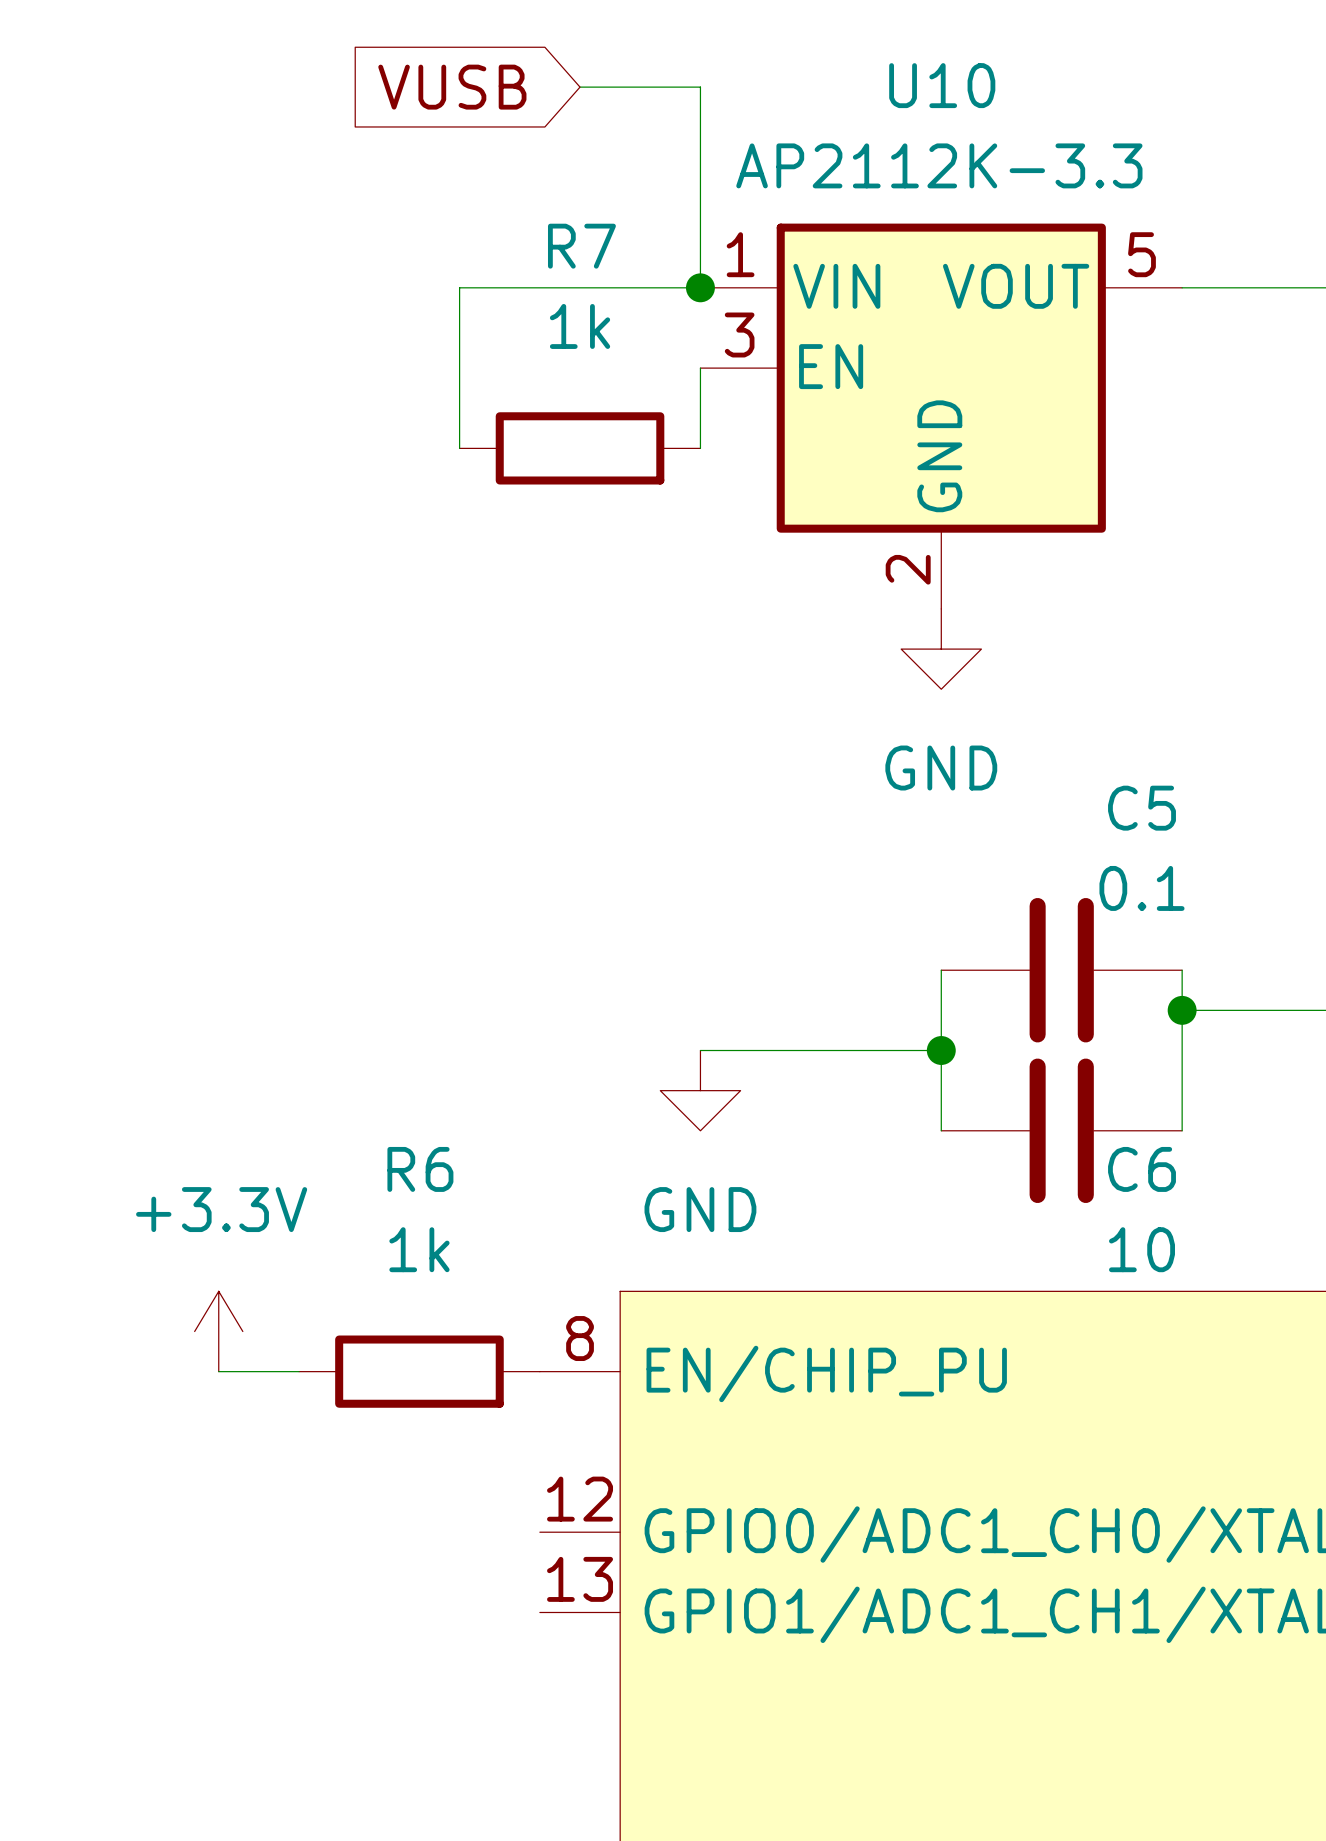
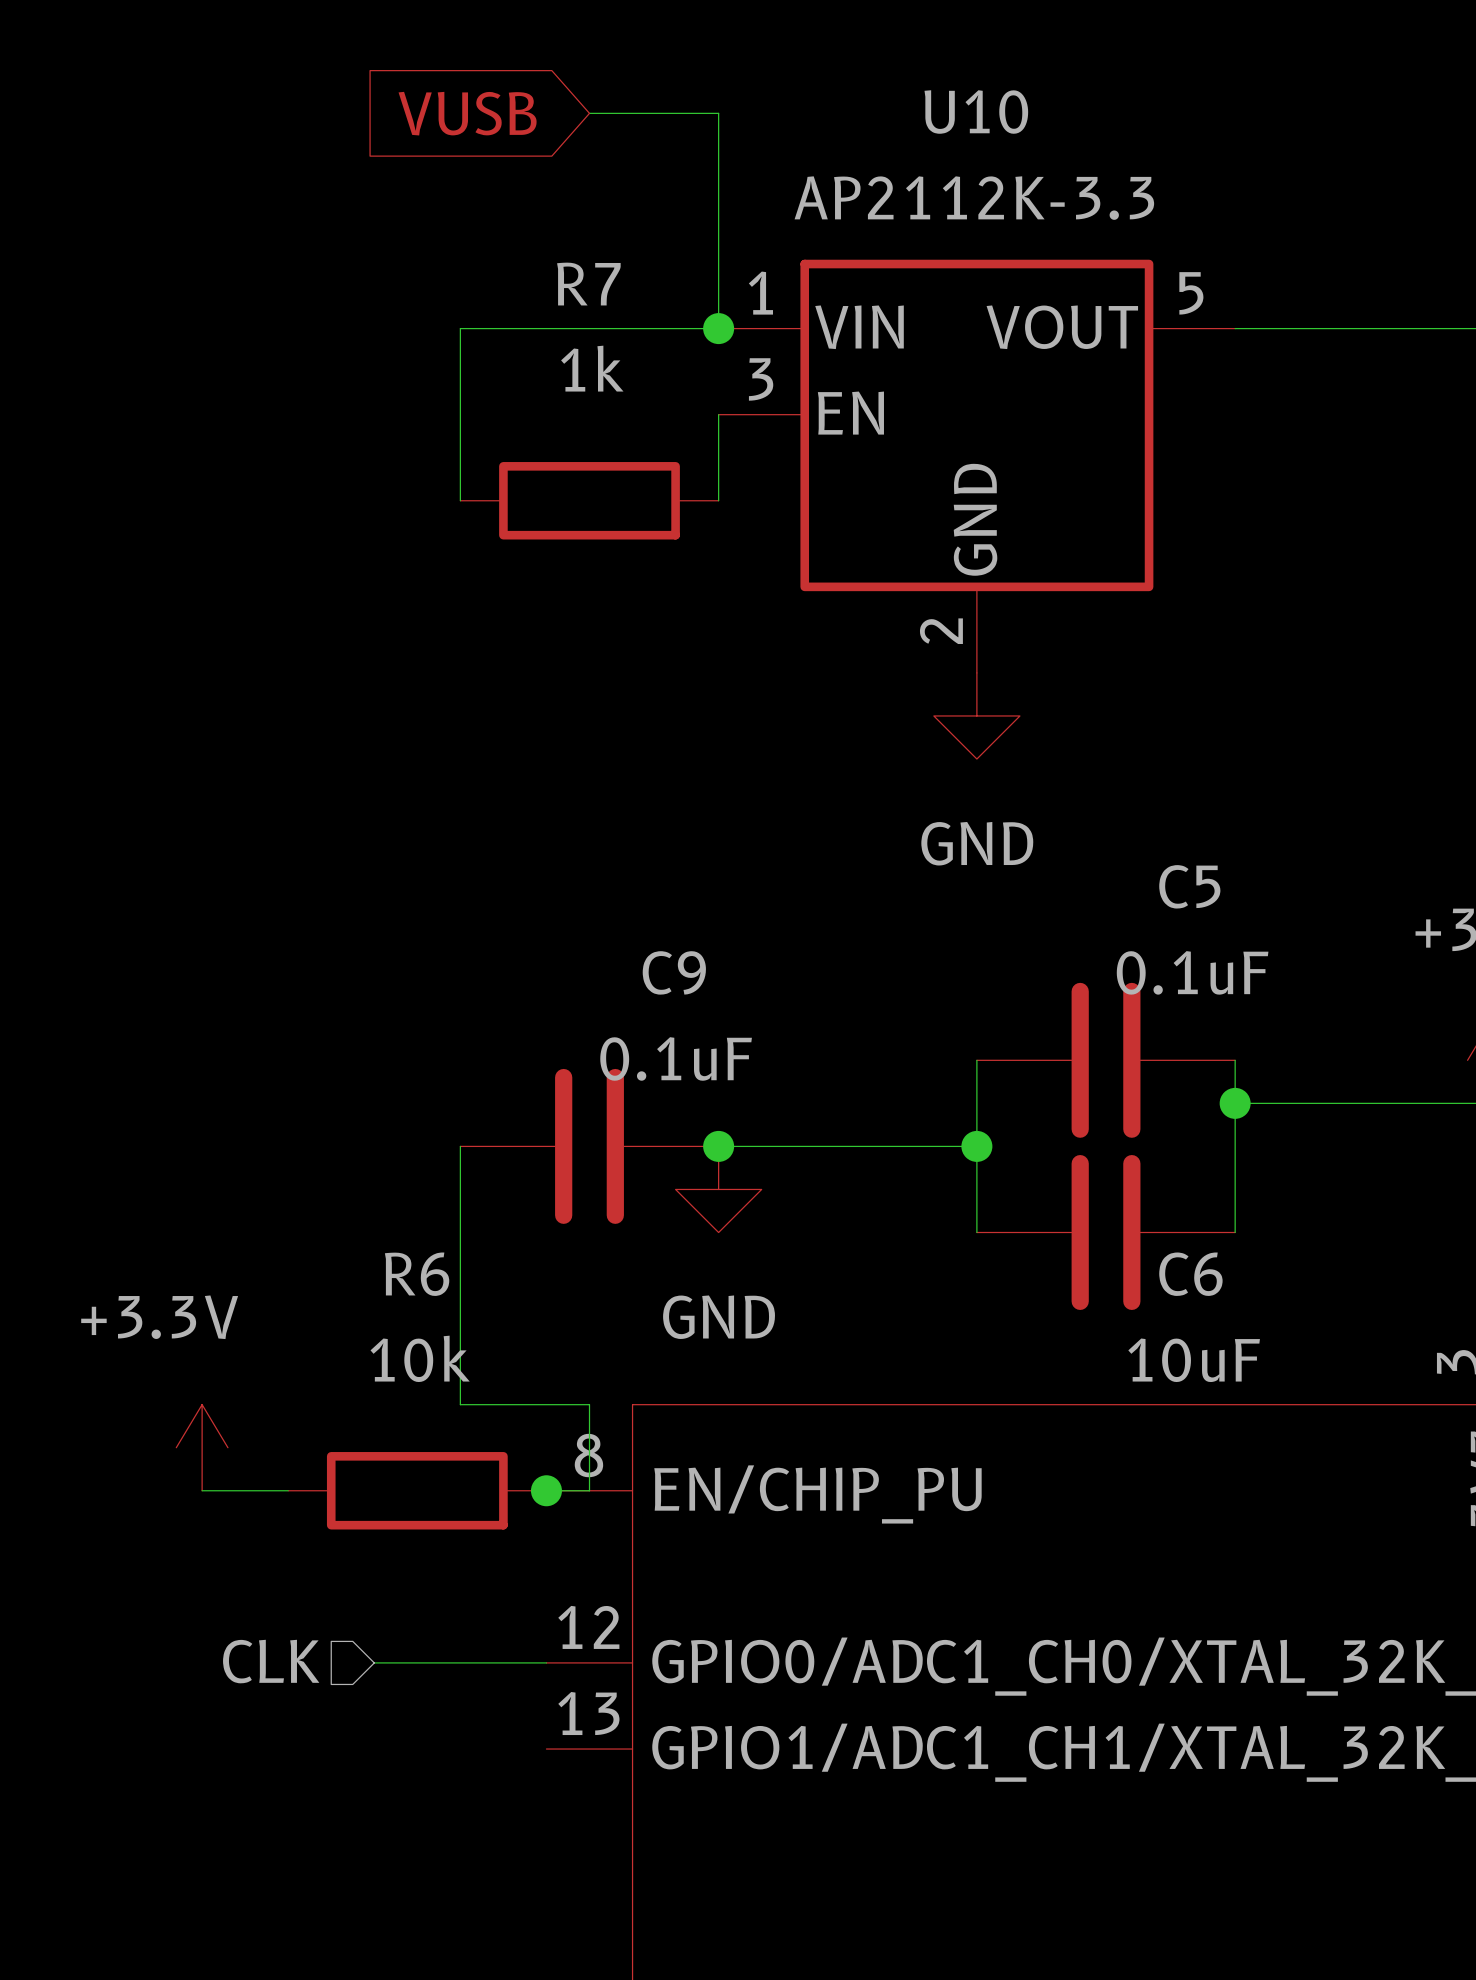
C5 value: 0.1 (1142, 888) -> 0.1uF (1192, 972)
wire: none -> (460, 1146) (460, 1404) (589, 1404) (589, 1490) (546, 1490)
C9: none -> 0.1uF (589, 1146)
junction: none -> (718, 1146)
power symbol text position: +3.3V (221, 1209) -> +3.3V (159, 1317)
R6 value: 1k (419, 1249) -> 10k (420, 1358)
C6 value: 10 (1142, 1249) -> 10uF (1194, 1360)
junction: none -> (546, 1490)
hierarchical label: none -> CLK (271, 1661)
wire: none -> (374, 1662) (546, 1662)

